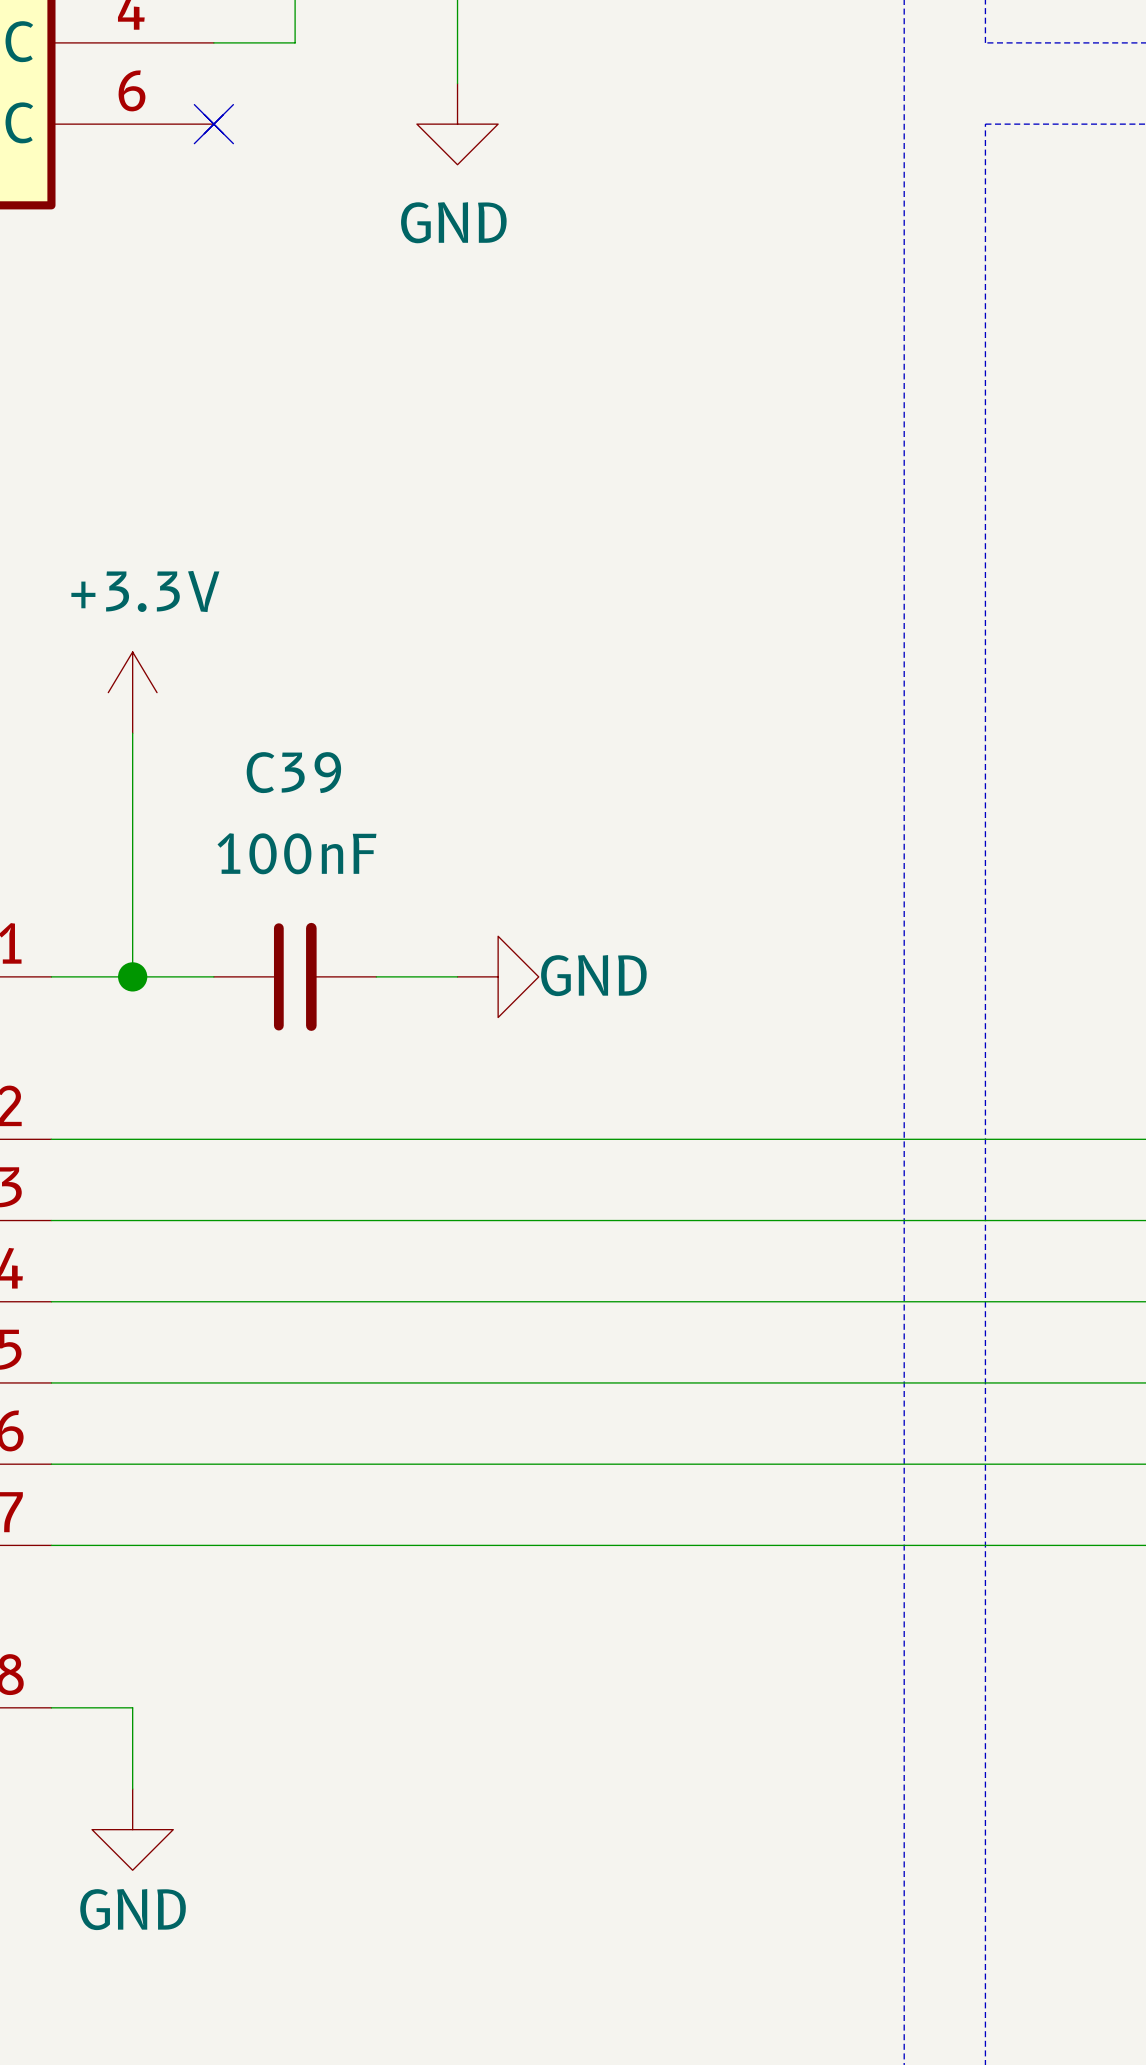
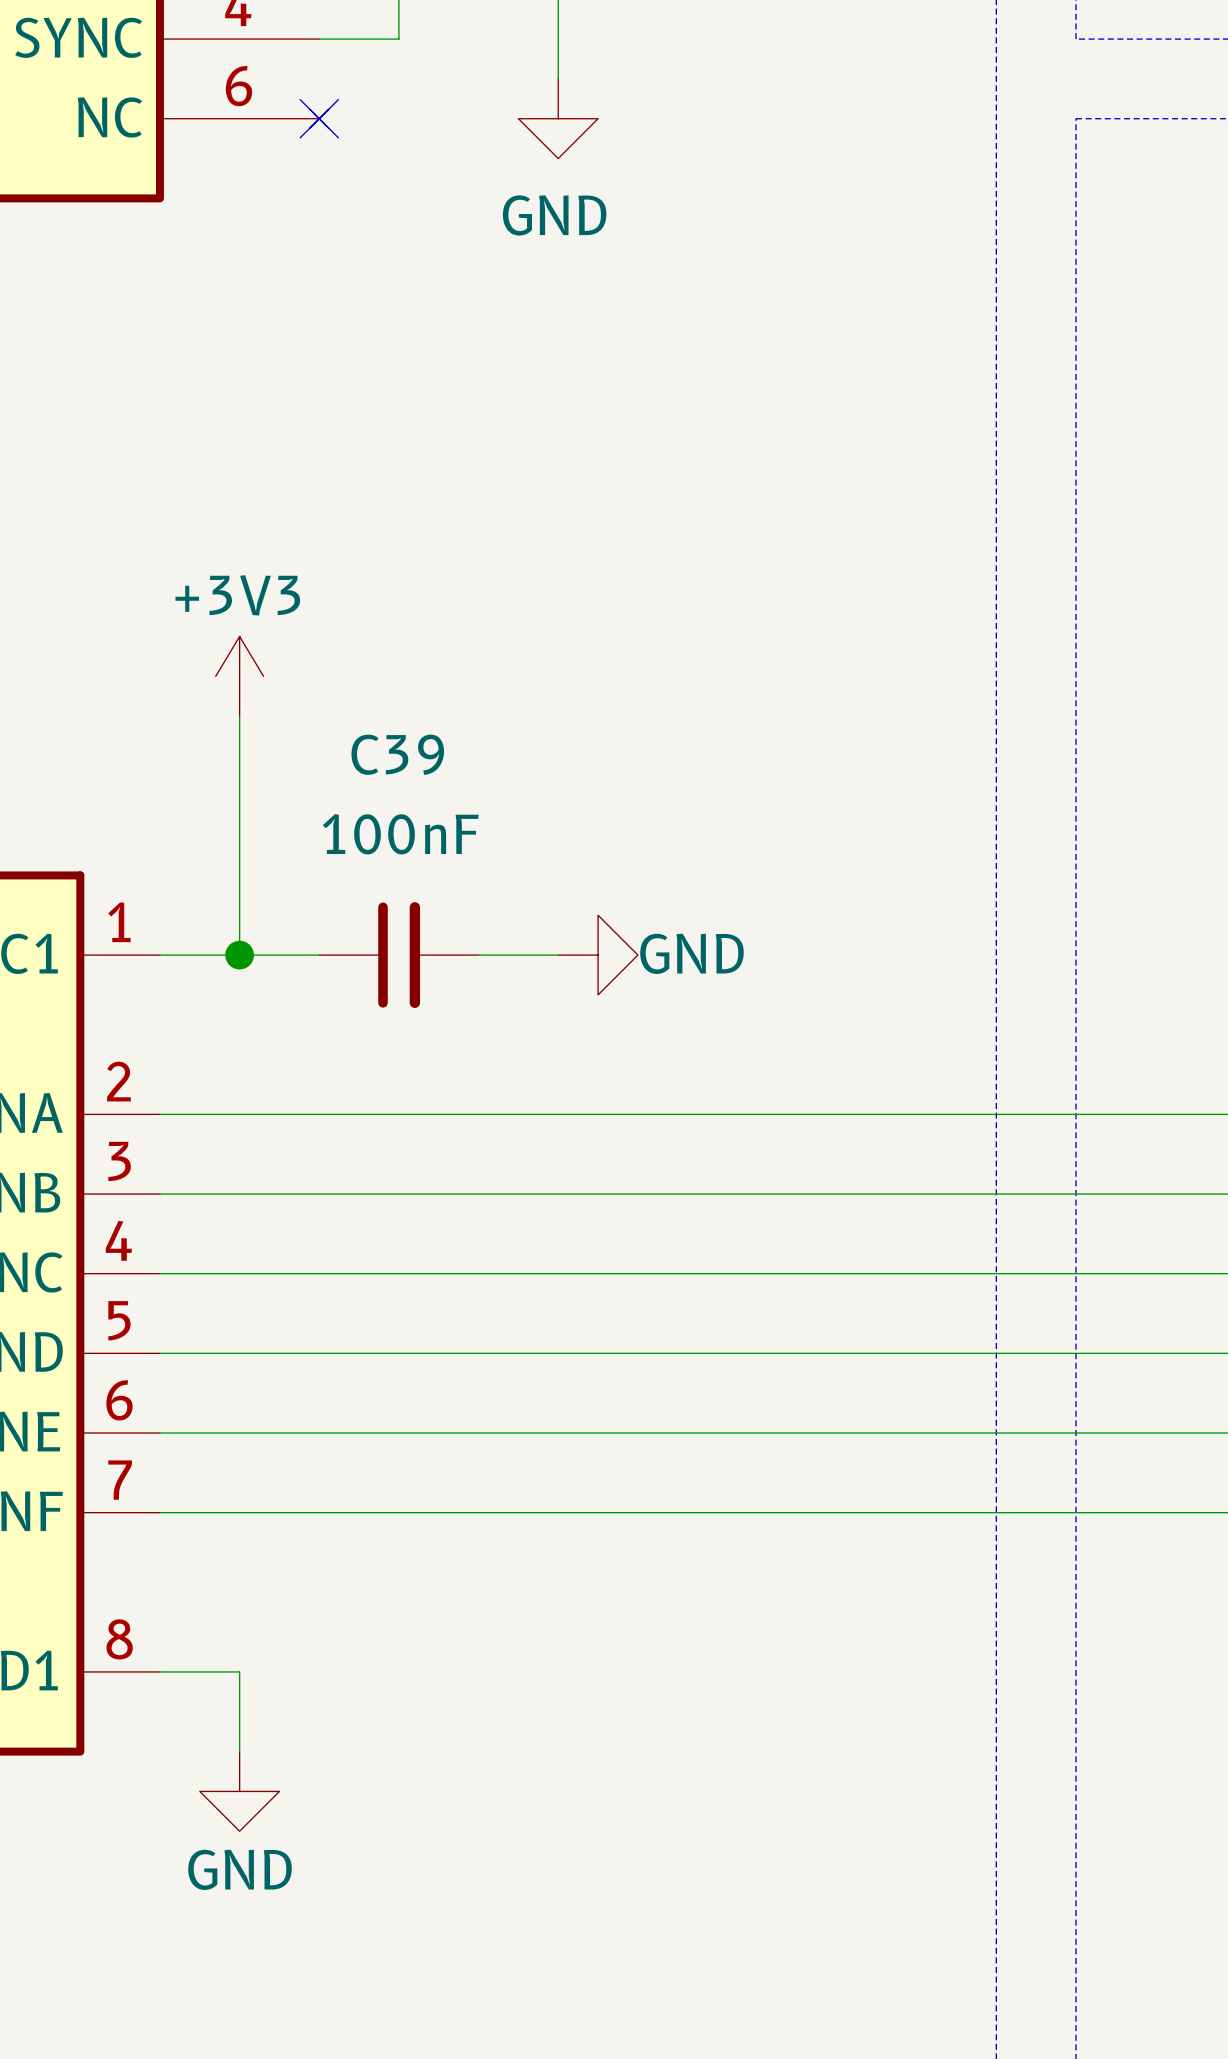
power symbol: +3.3V (132, 692) -> +3V3 (239, 676)

